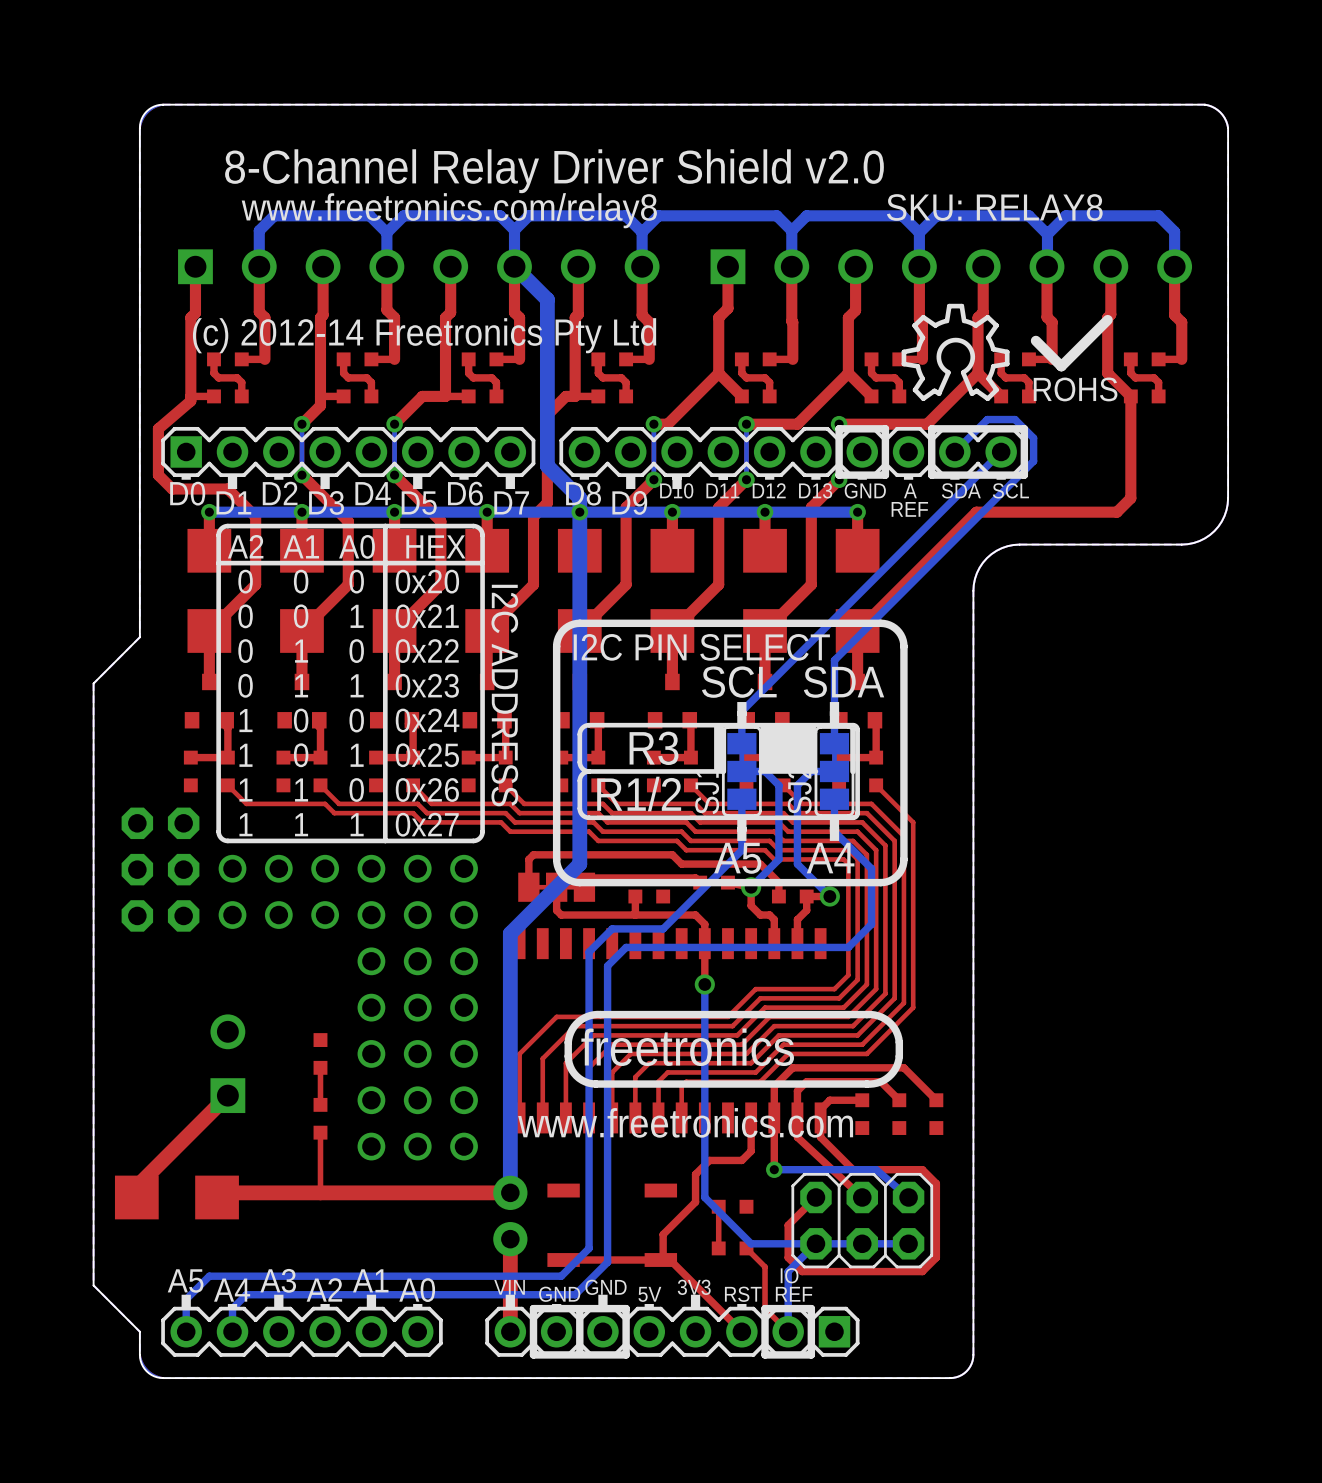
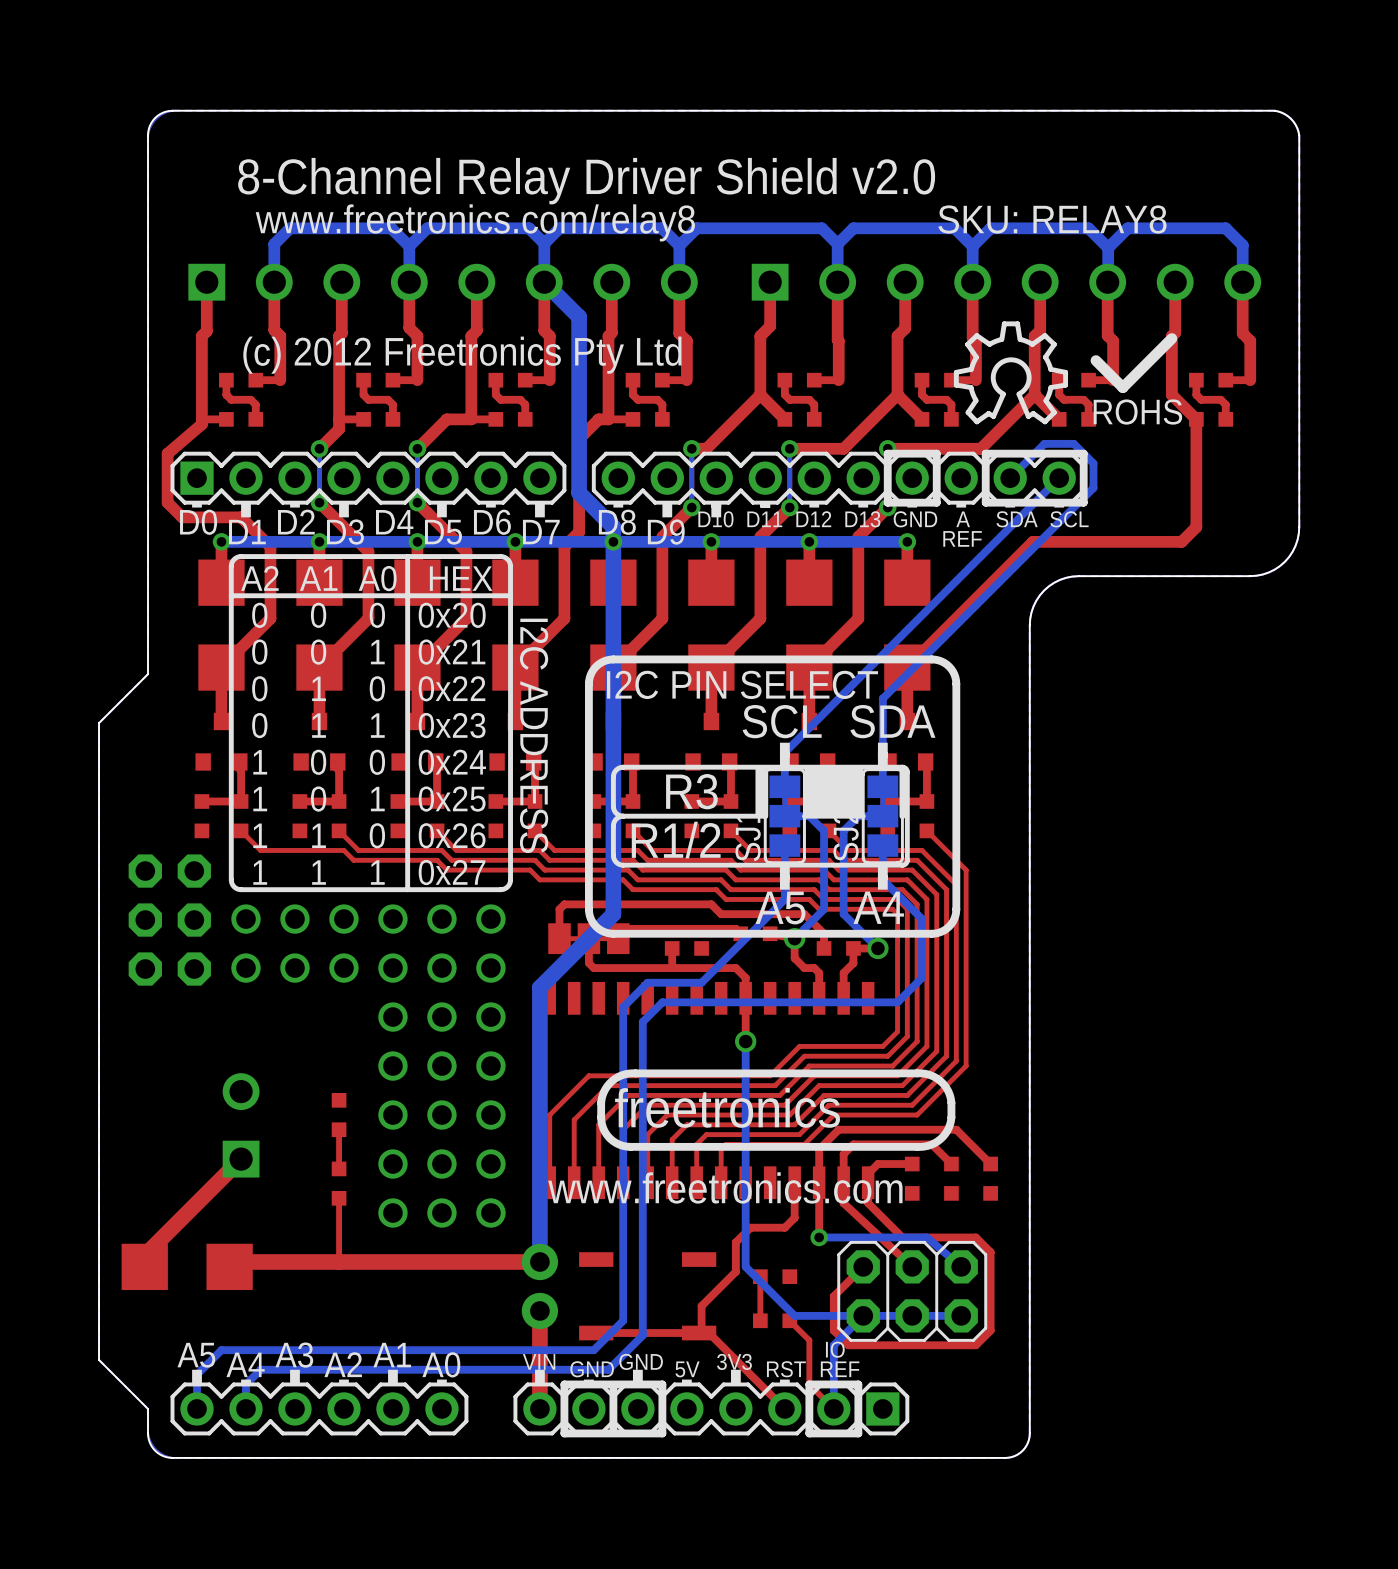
text: (c) 2012-14 Freetronics Pty Ltd (424, 335) -> (c) 2012 Freetronics Pty Ltd (462, 355)

